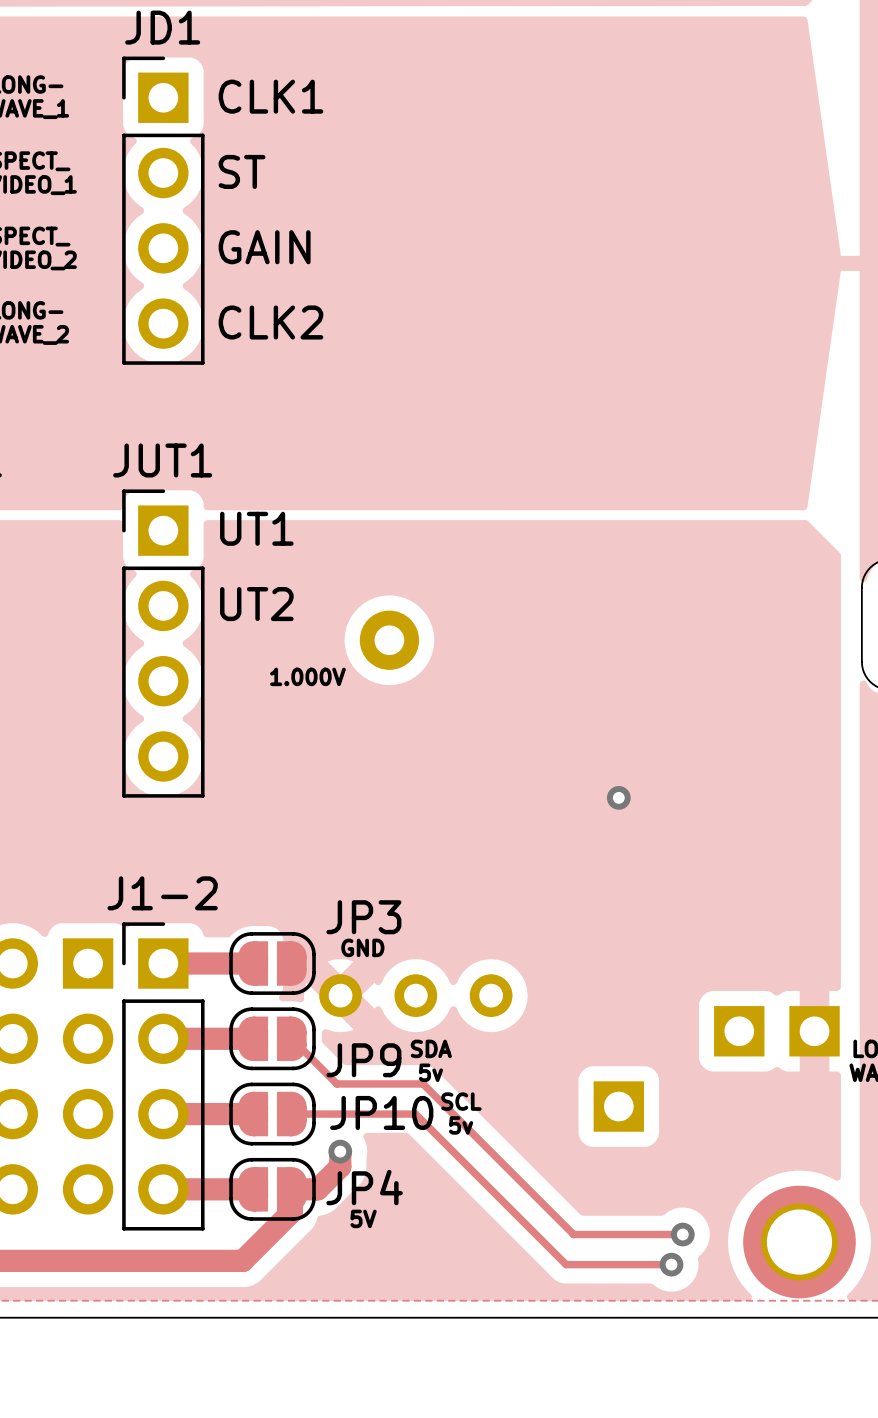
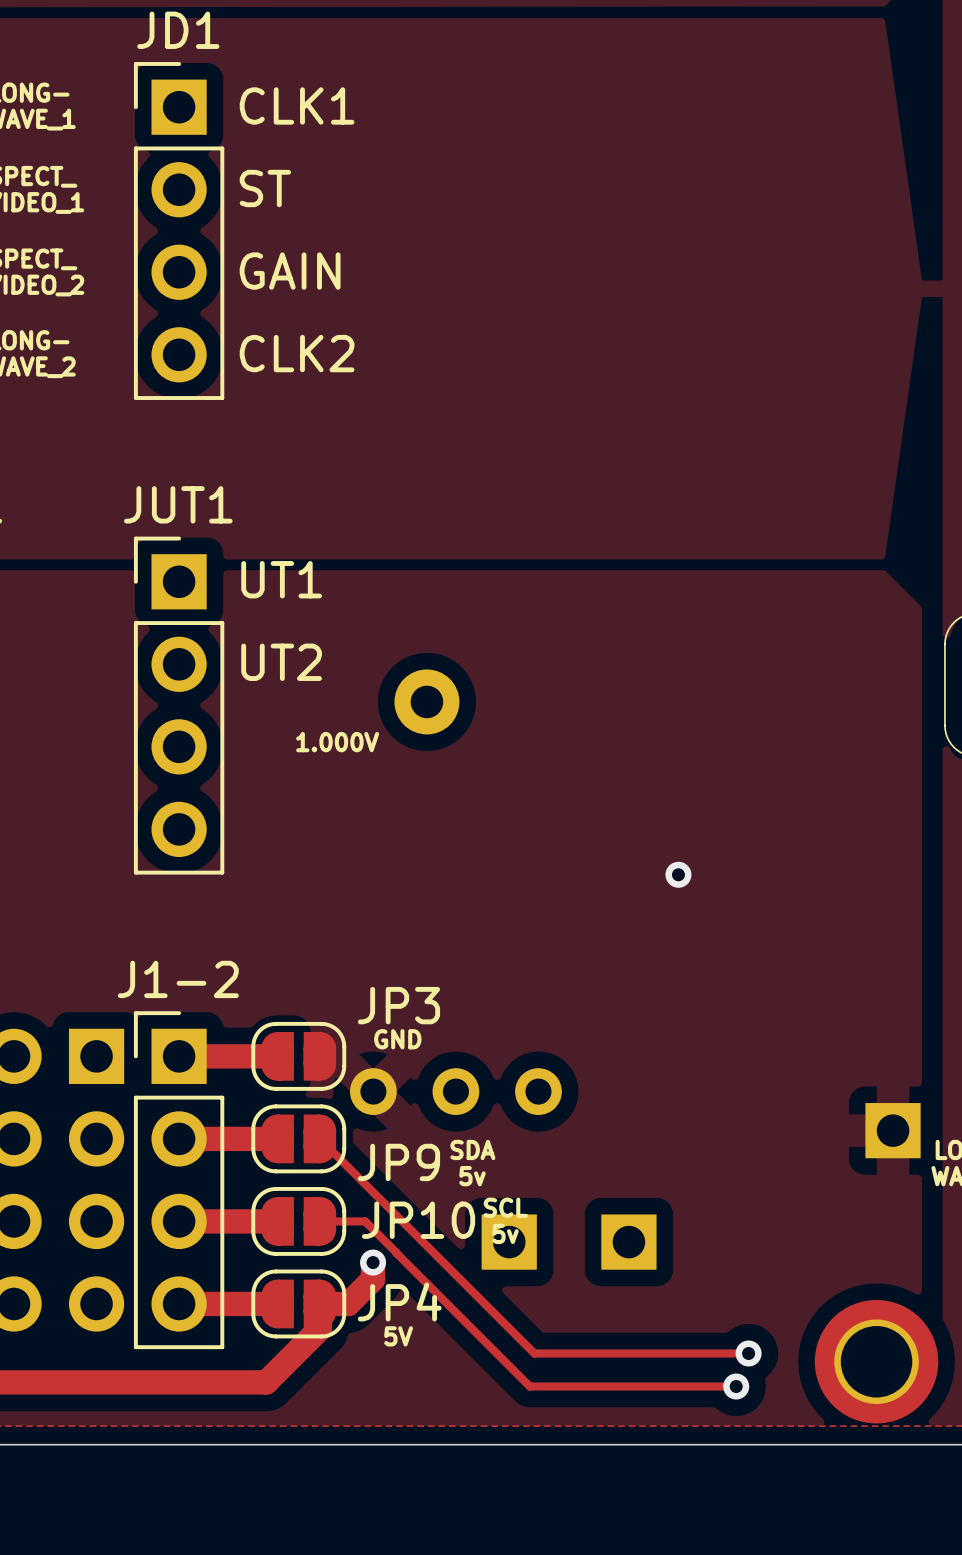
part: (739, 1031) -> none
track: (336, 1083) (423, 1083) (573, 1234) -> (369, 1188) (534, 1353) (628, 1353)
part position: (618, 1106) -> (628, 1242)
track: (333, 1114) (415, 1114) (566, 1264) -> (396, 1253) (529, 1386) (620, 1386)
track: none -> (365, 1221) (396, 1252)
part: none -> (509, 1242)

